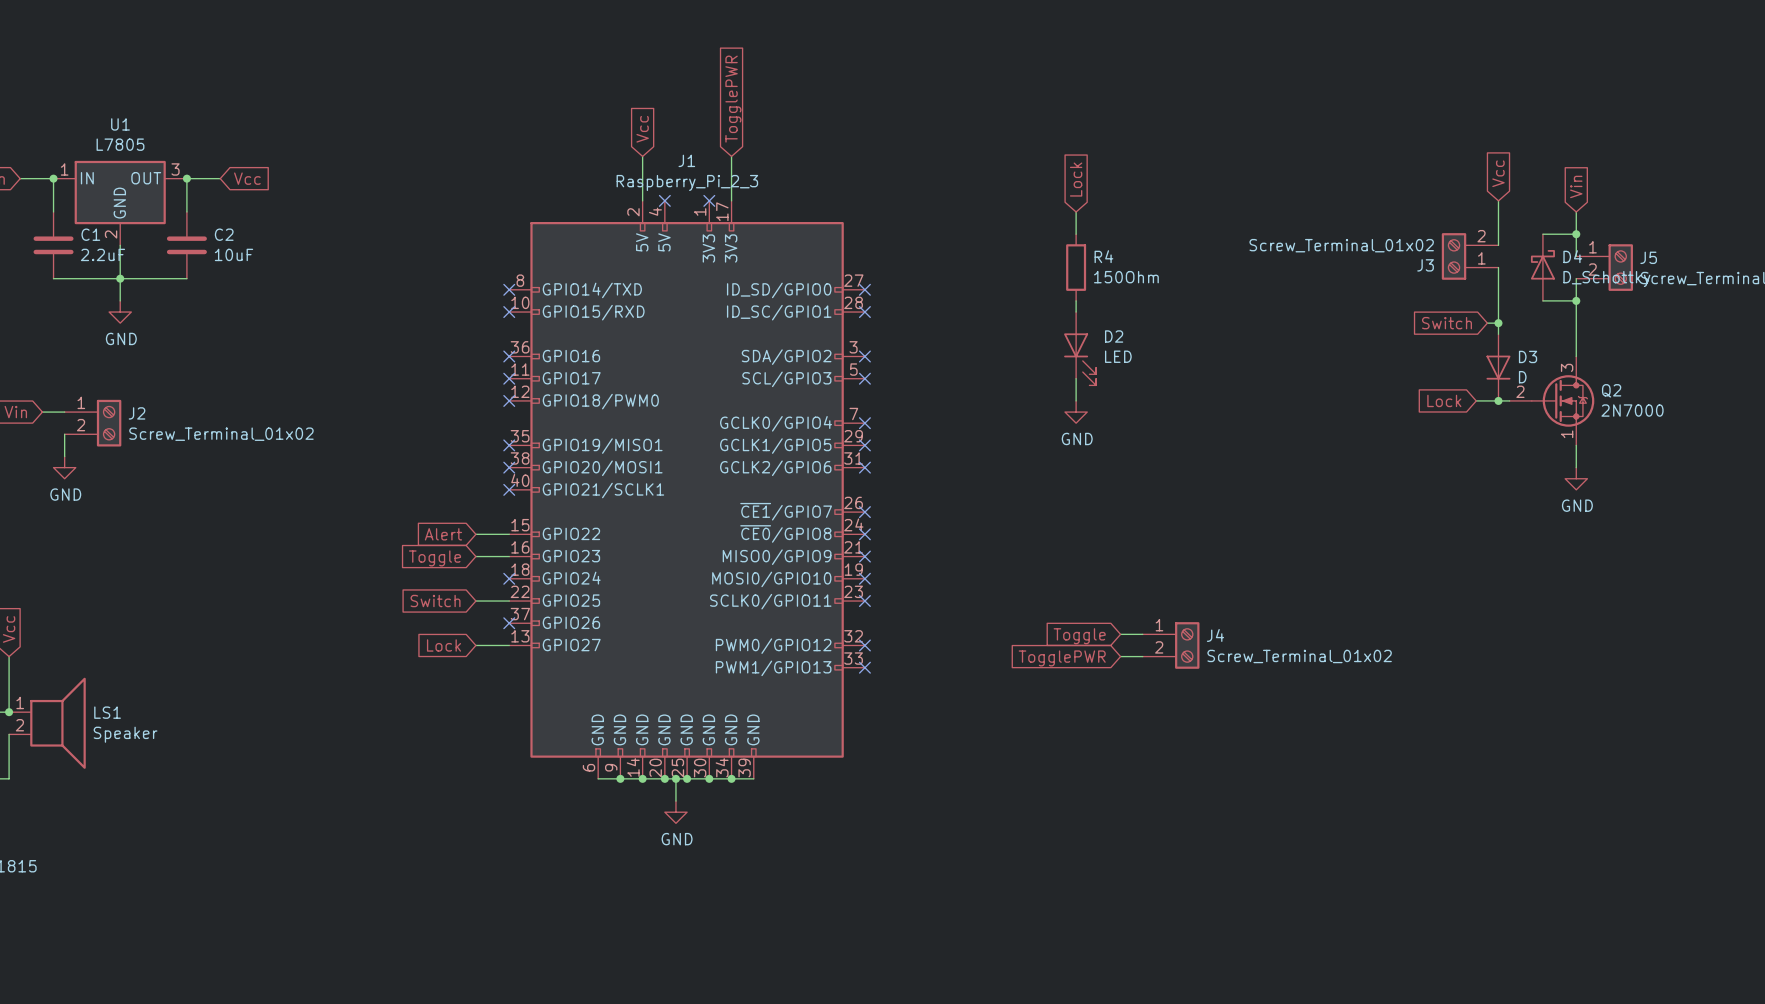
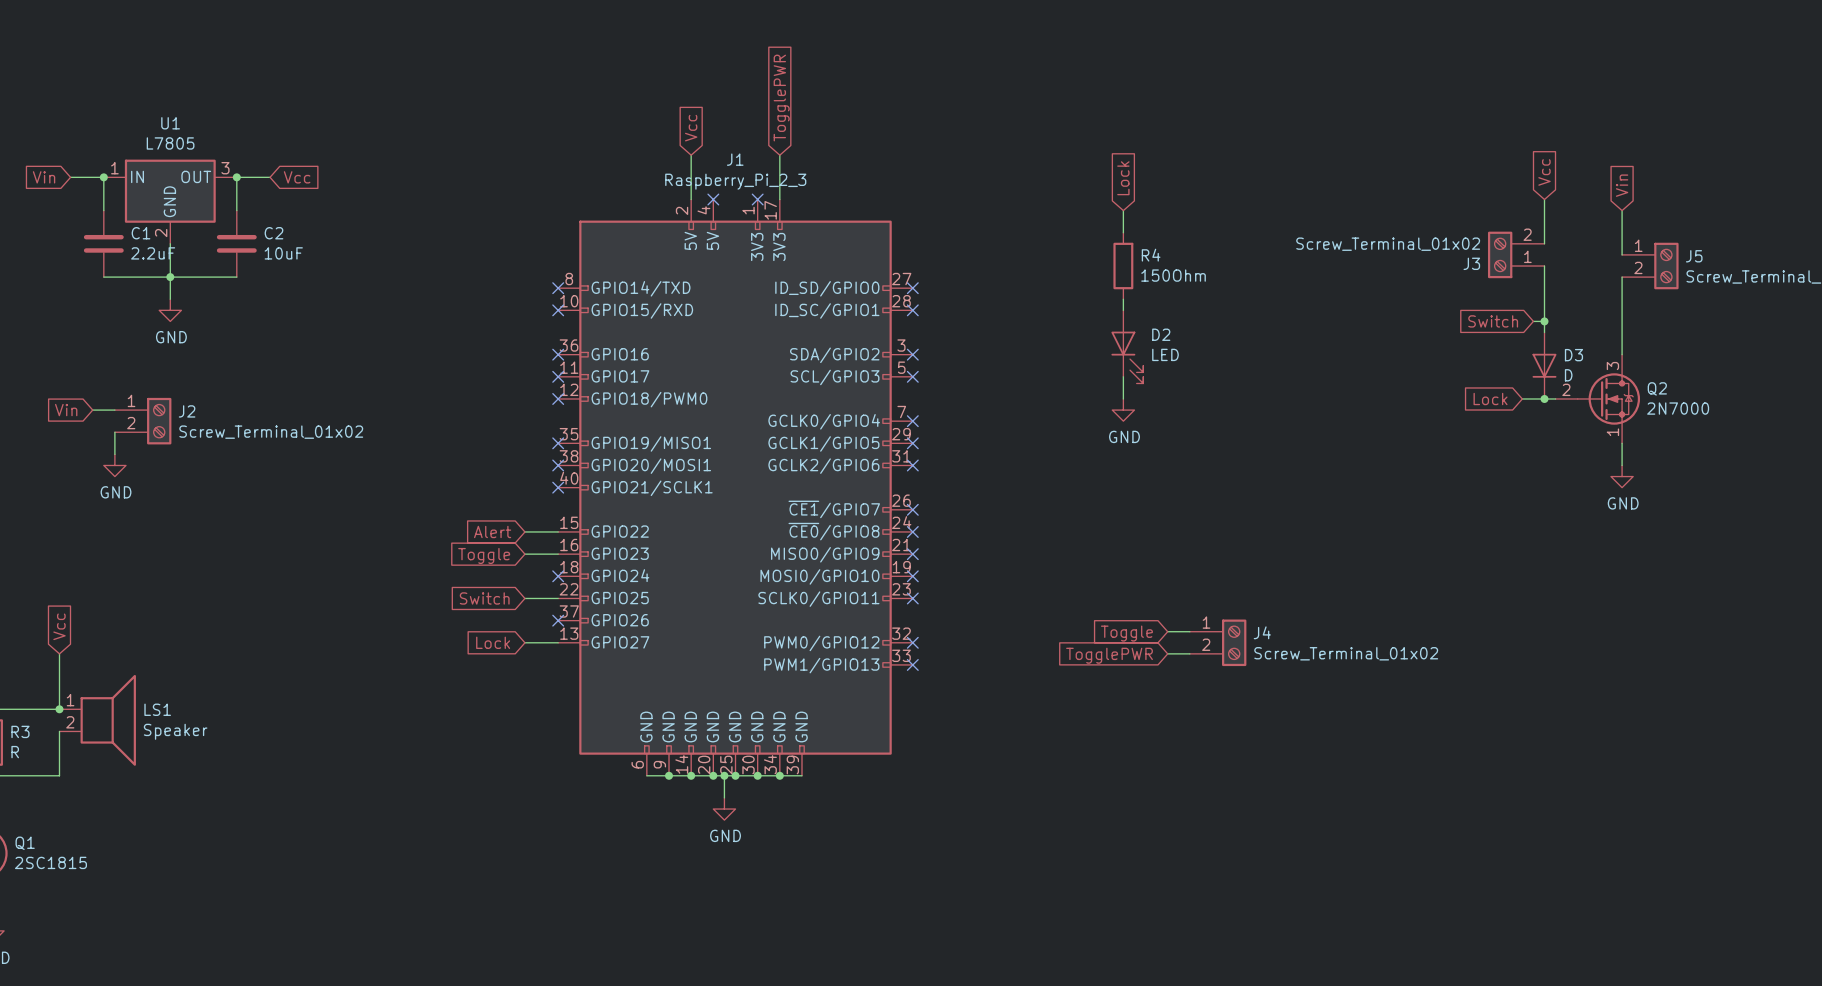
wire: (1542, 234) (1576, 234) -> none
junction: (1576, 234) -> none
D4: D_Schottky (1542, 267) -> none
wire: (1542, 300) (1576, 300) -> none
junction: (1576, 300) -> none

